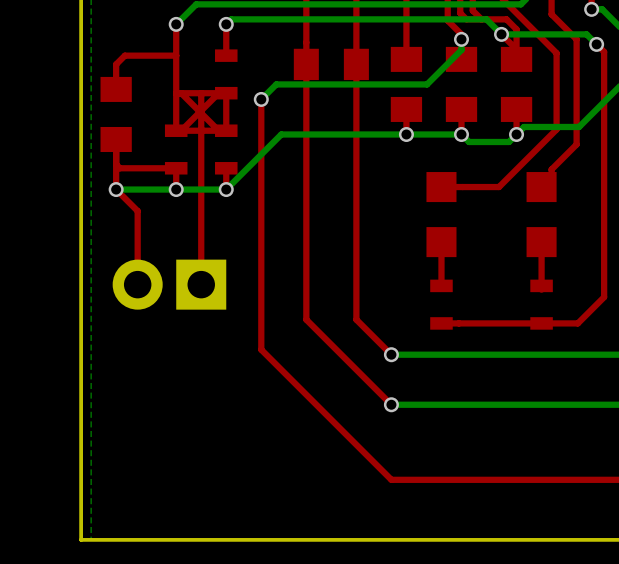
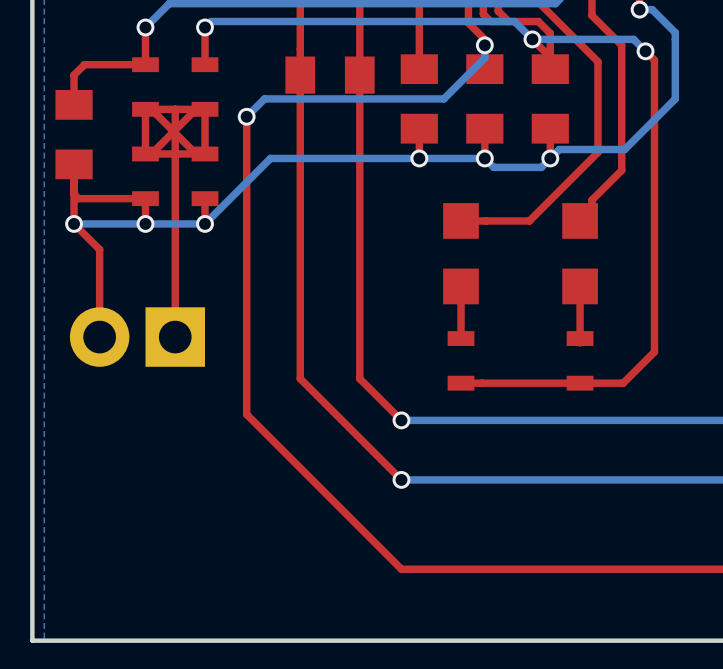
top track: (176, 55) (176, 93) -> none
part: none -> (145, 87)

